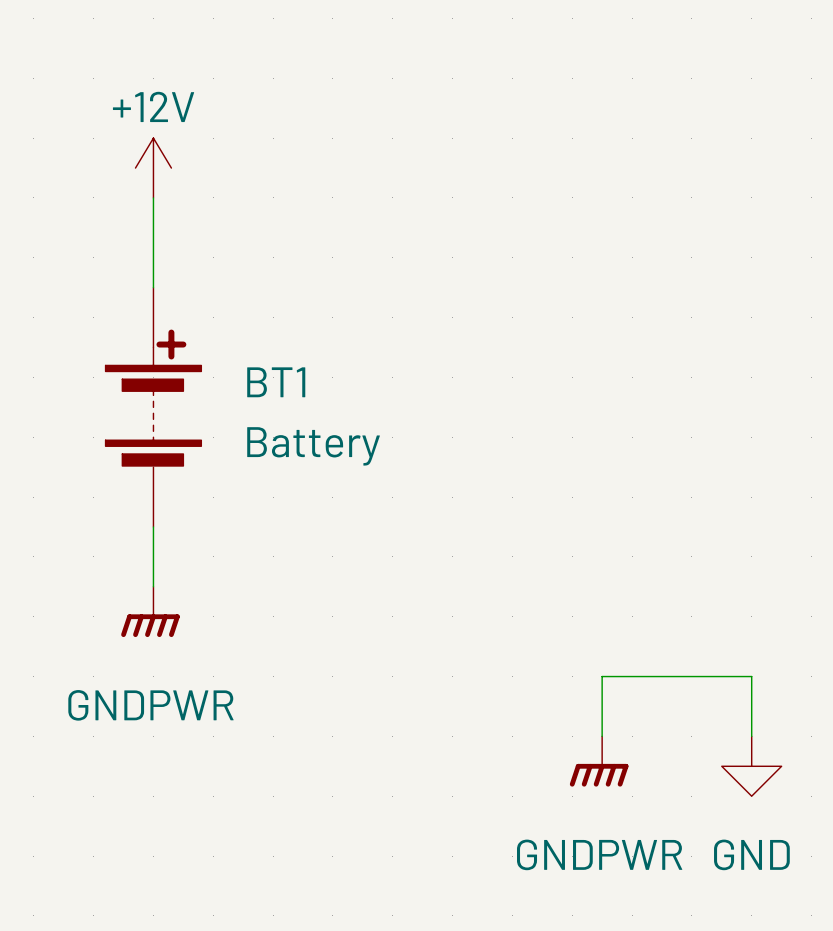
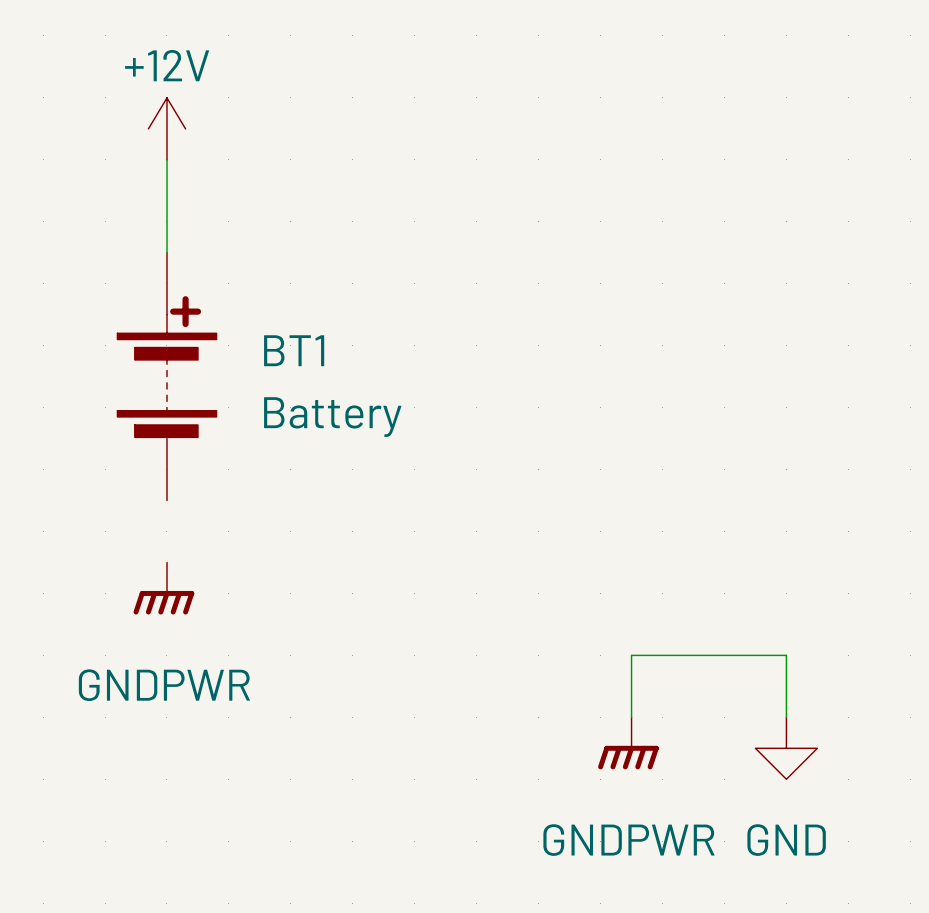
wire: (153, 526) (153, 586) -> none

